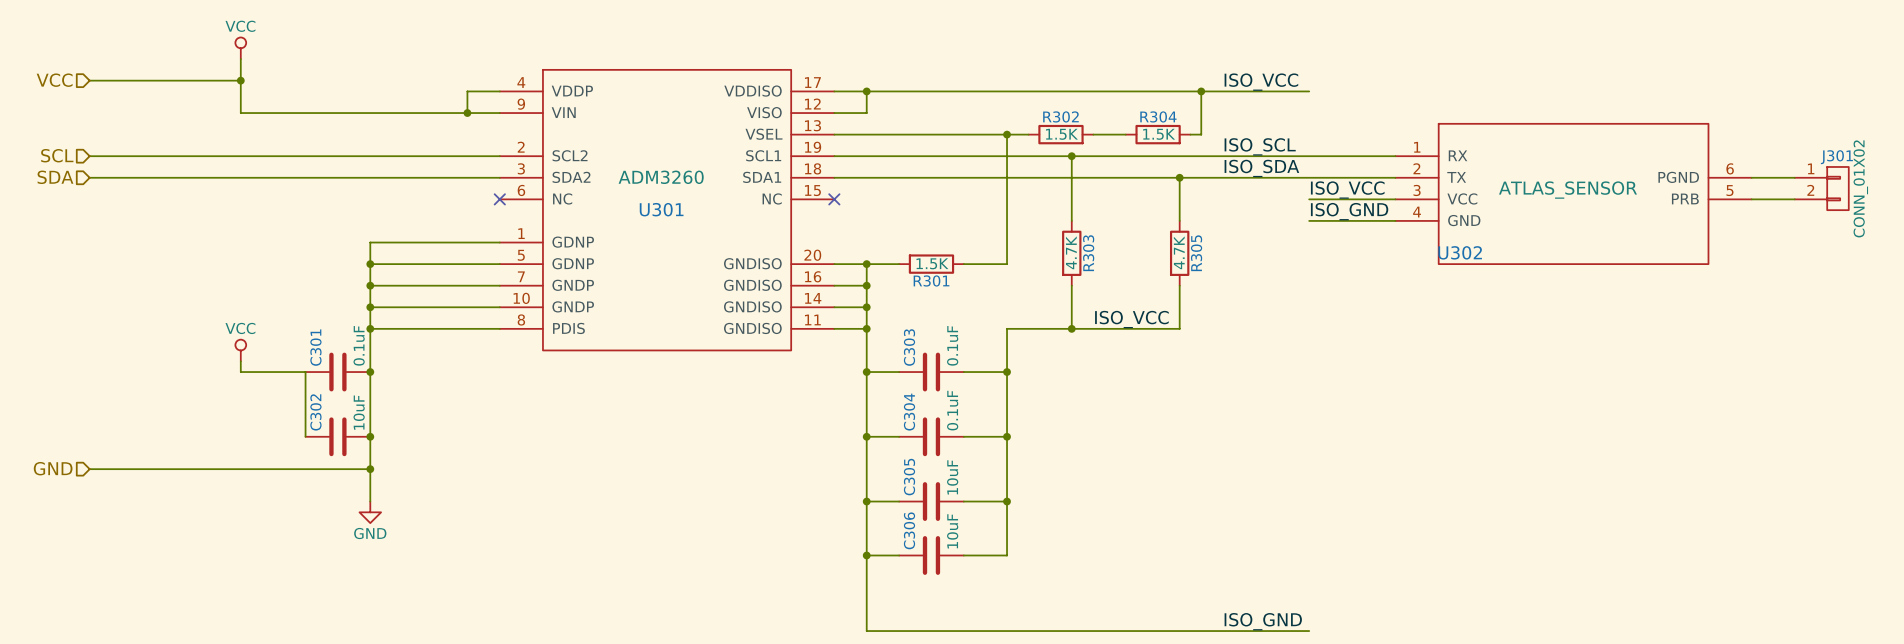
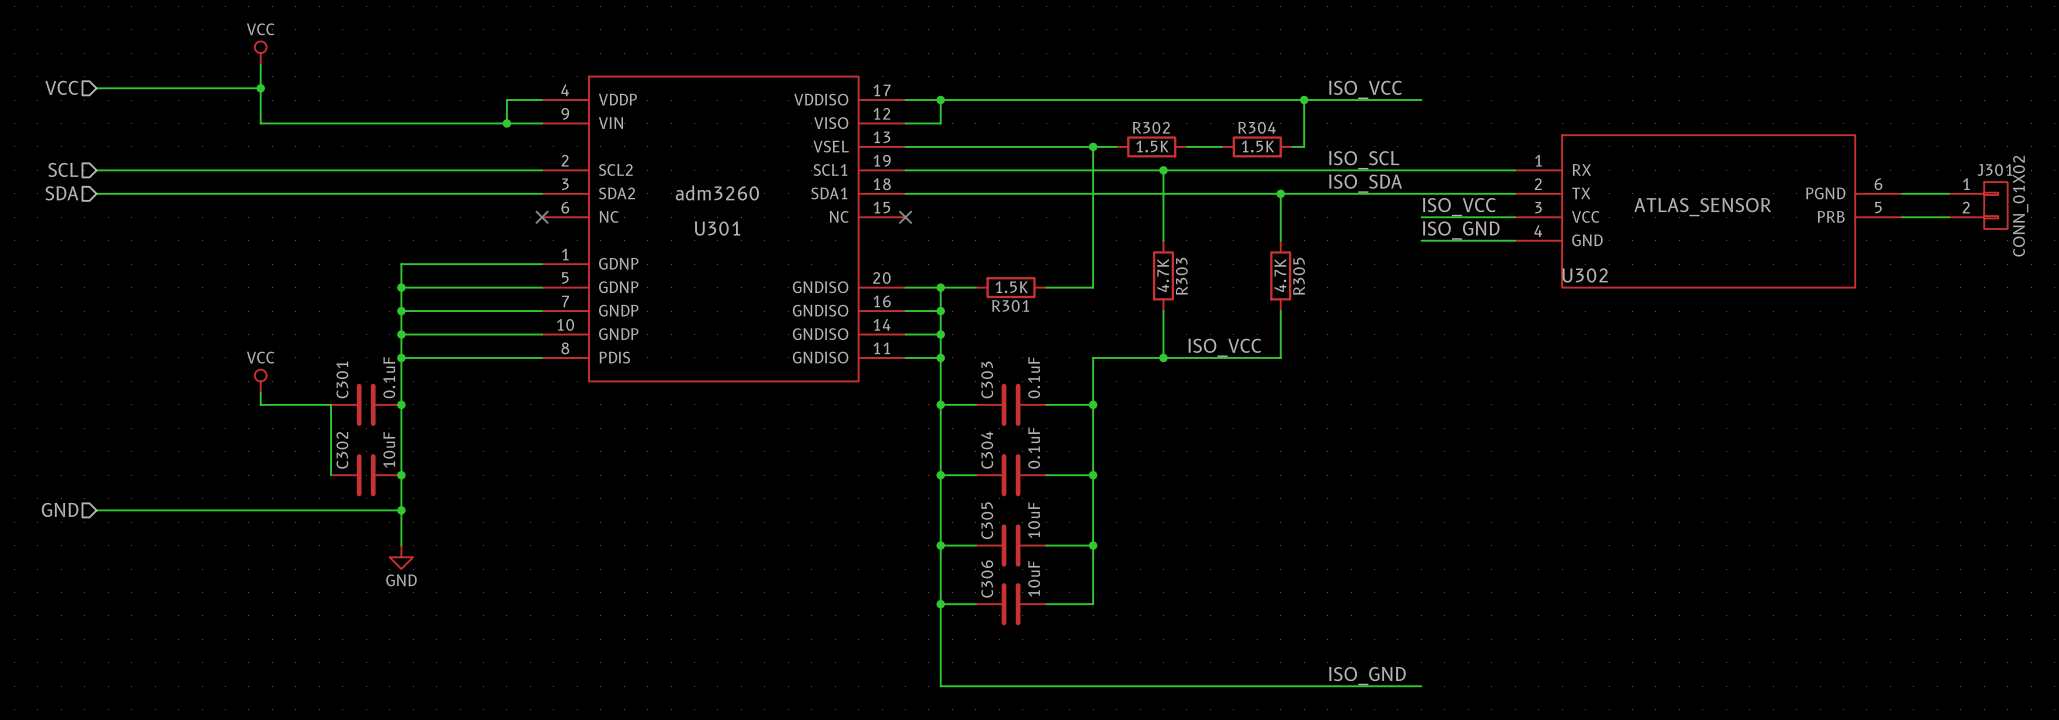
U301 value: ADM3260 (661, 177) -> adm3260 (717, 192)

